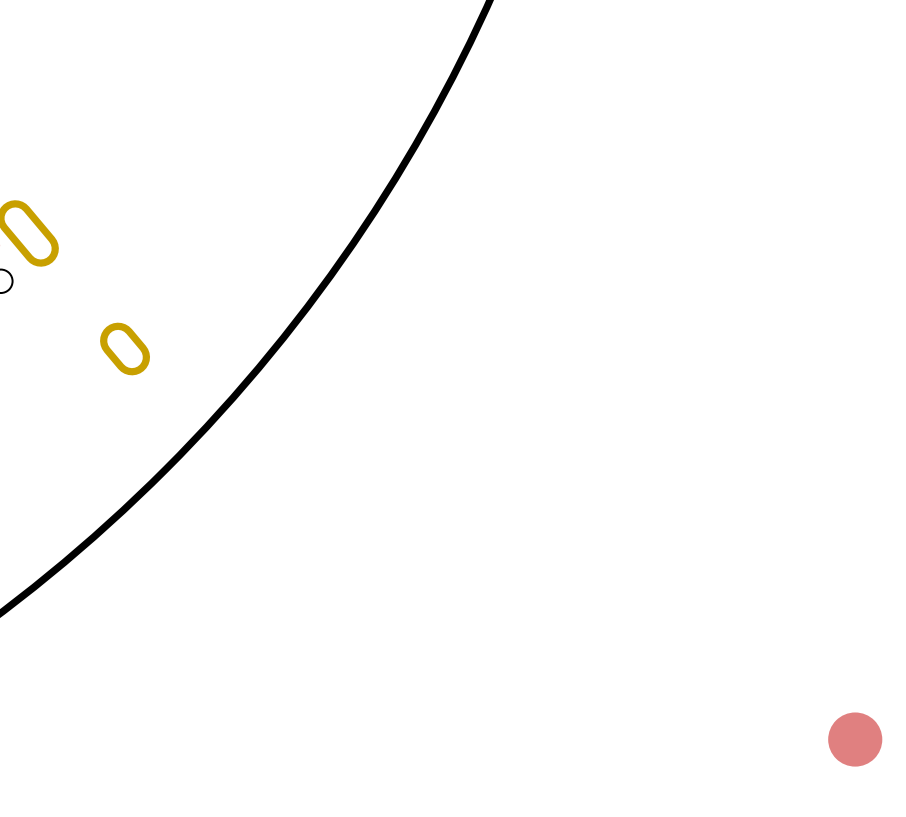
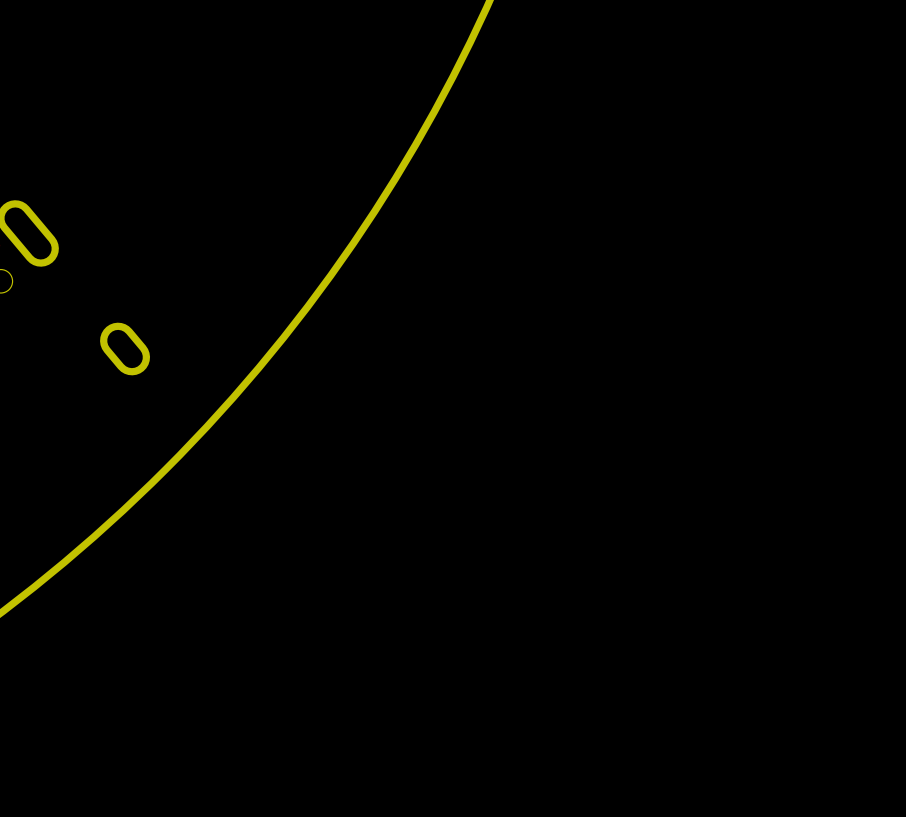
part: (855, 739) -> none

